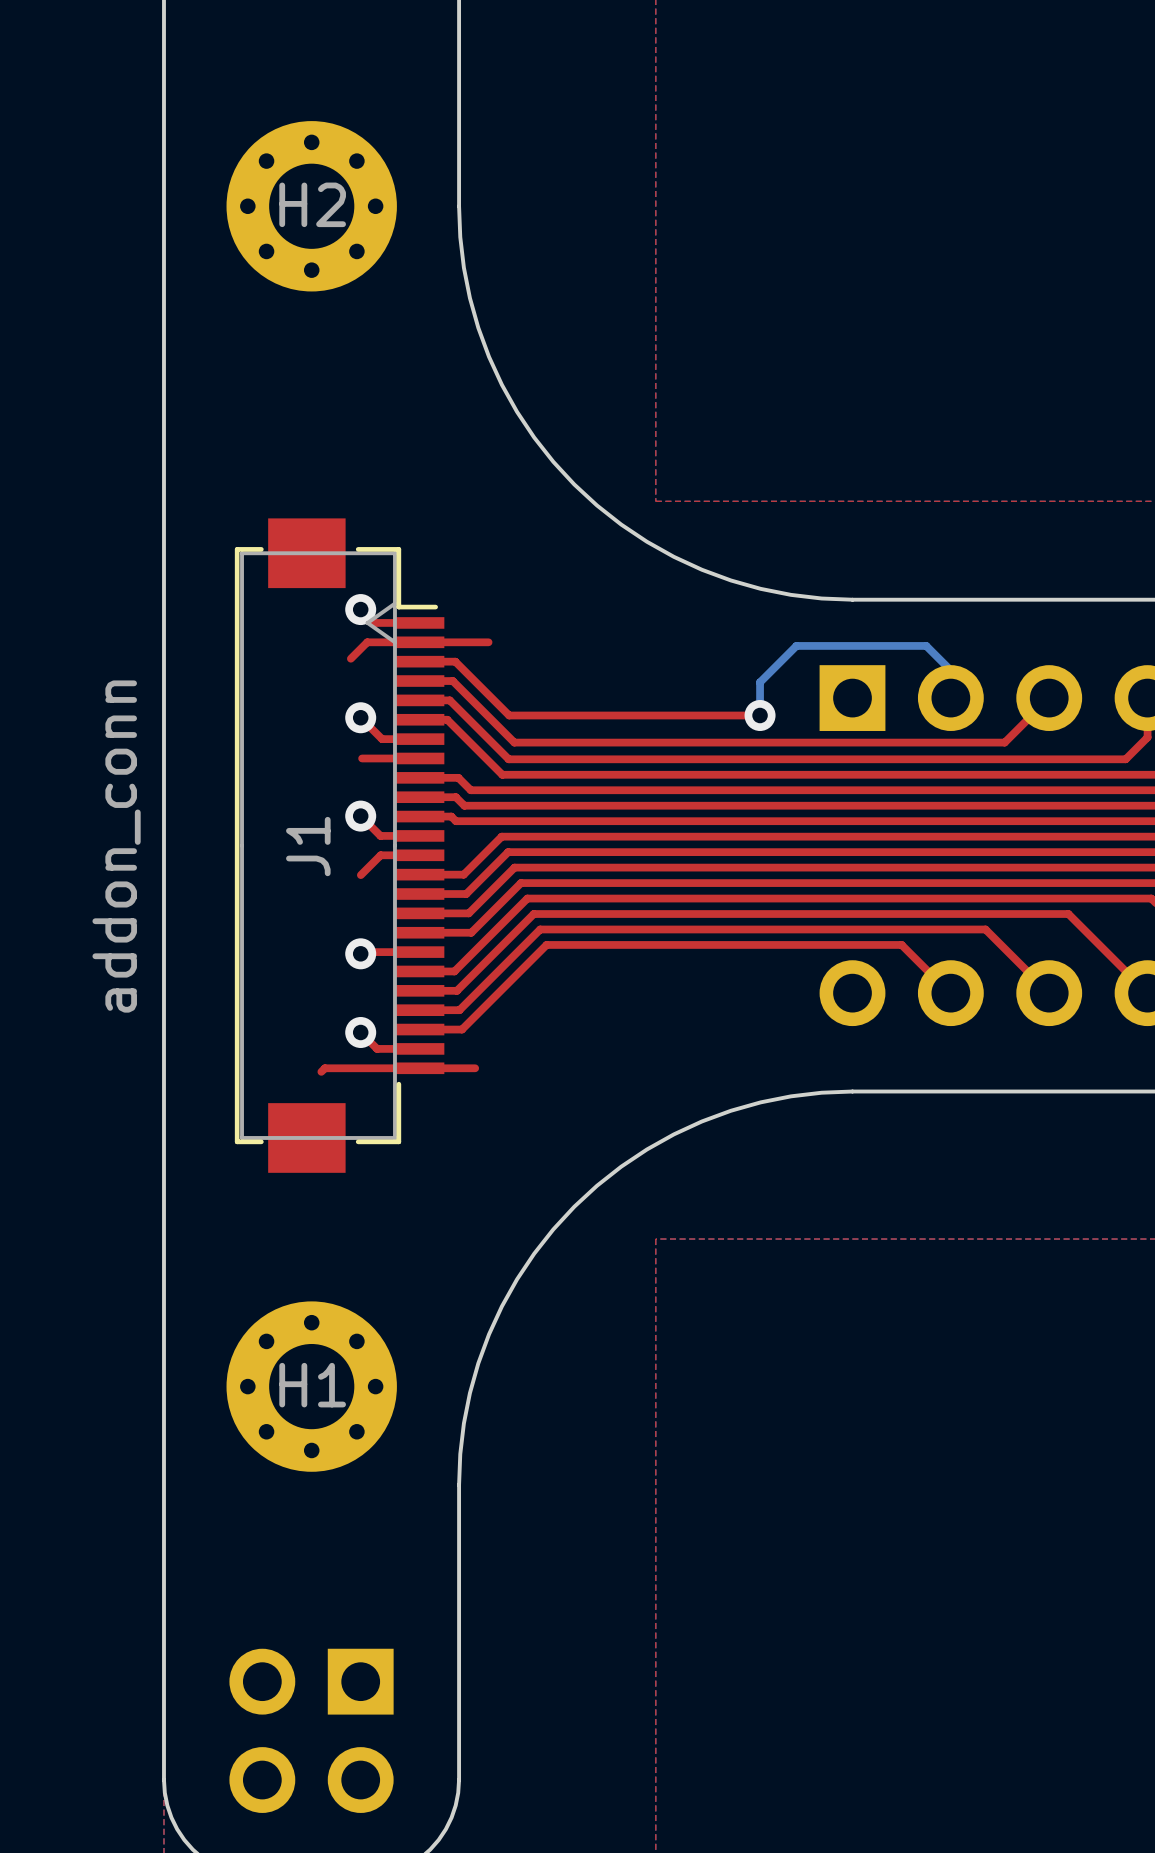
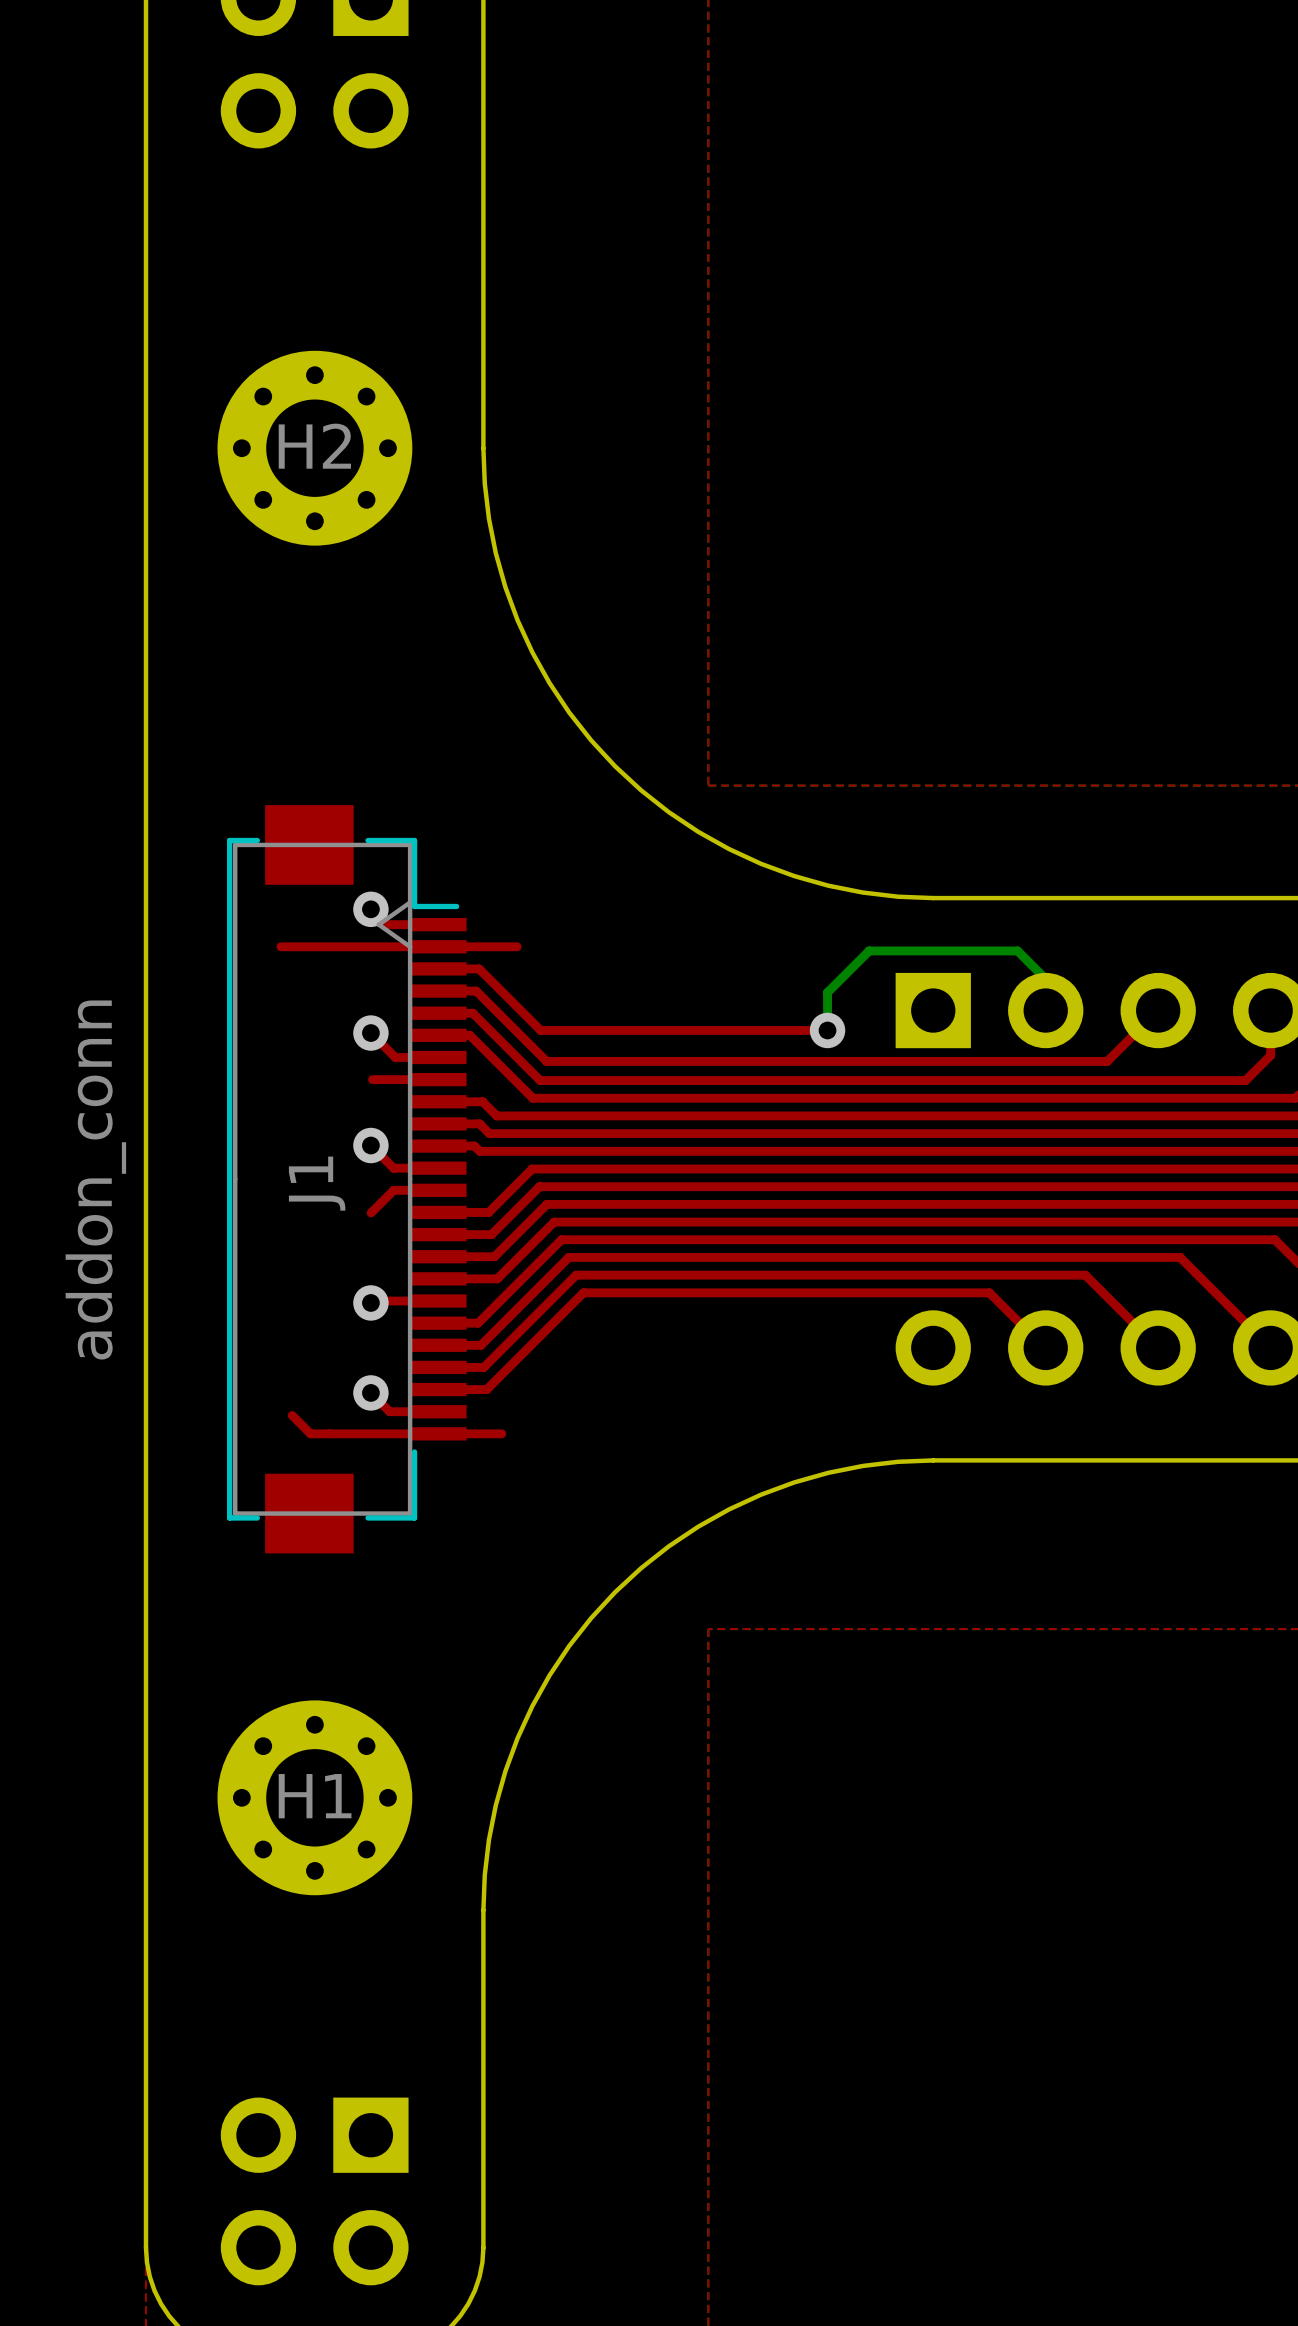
top track: (367, 642) (350, 658) -> (378, 946) (280, 946)
top track: (324, 1068) (321, 1071) -> (330, 1433) (310, 1433) (292, 1415)

